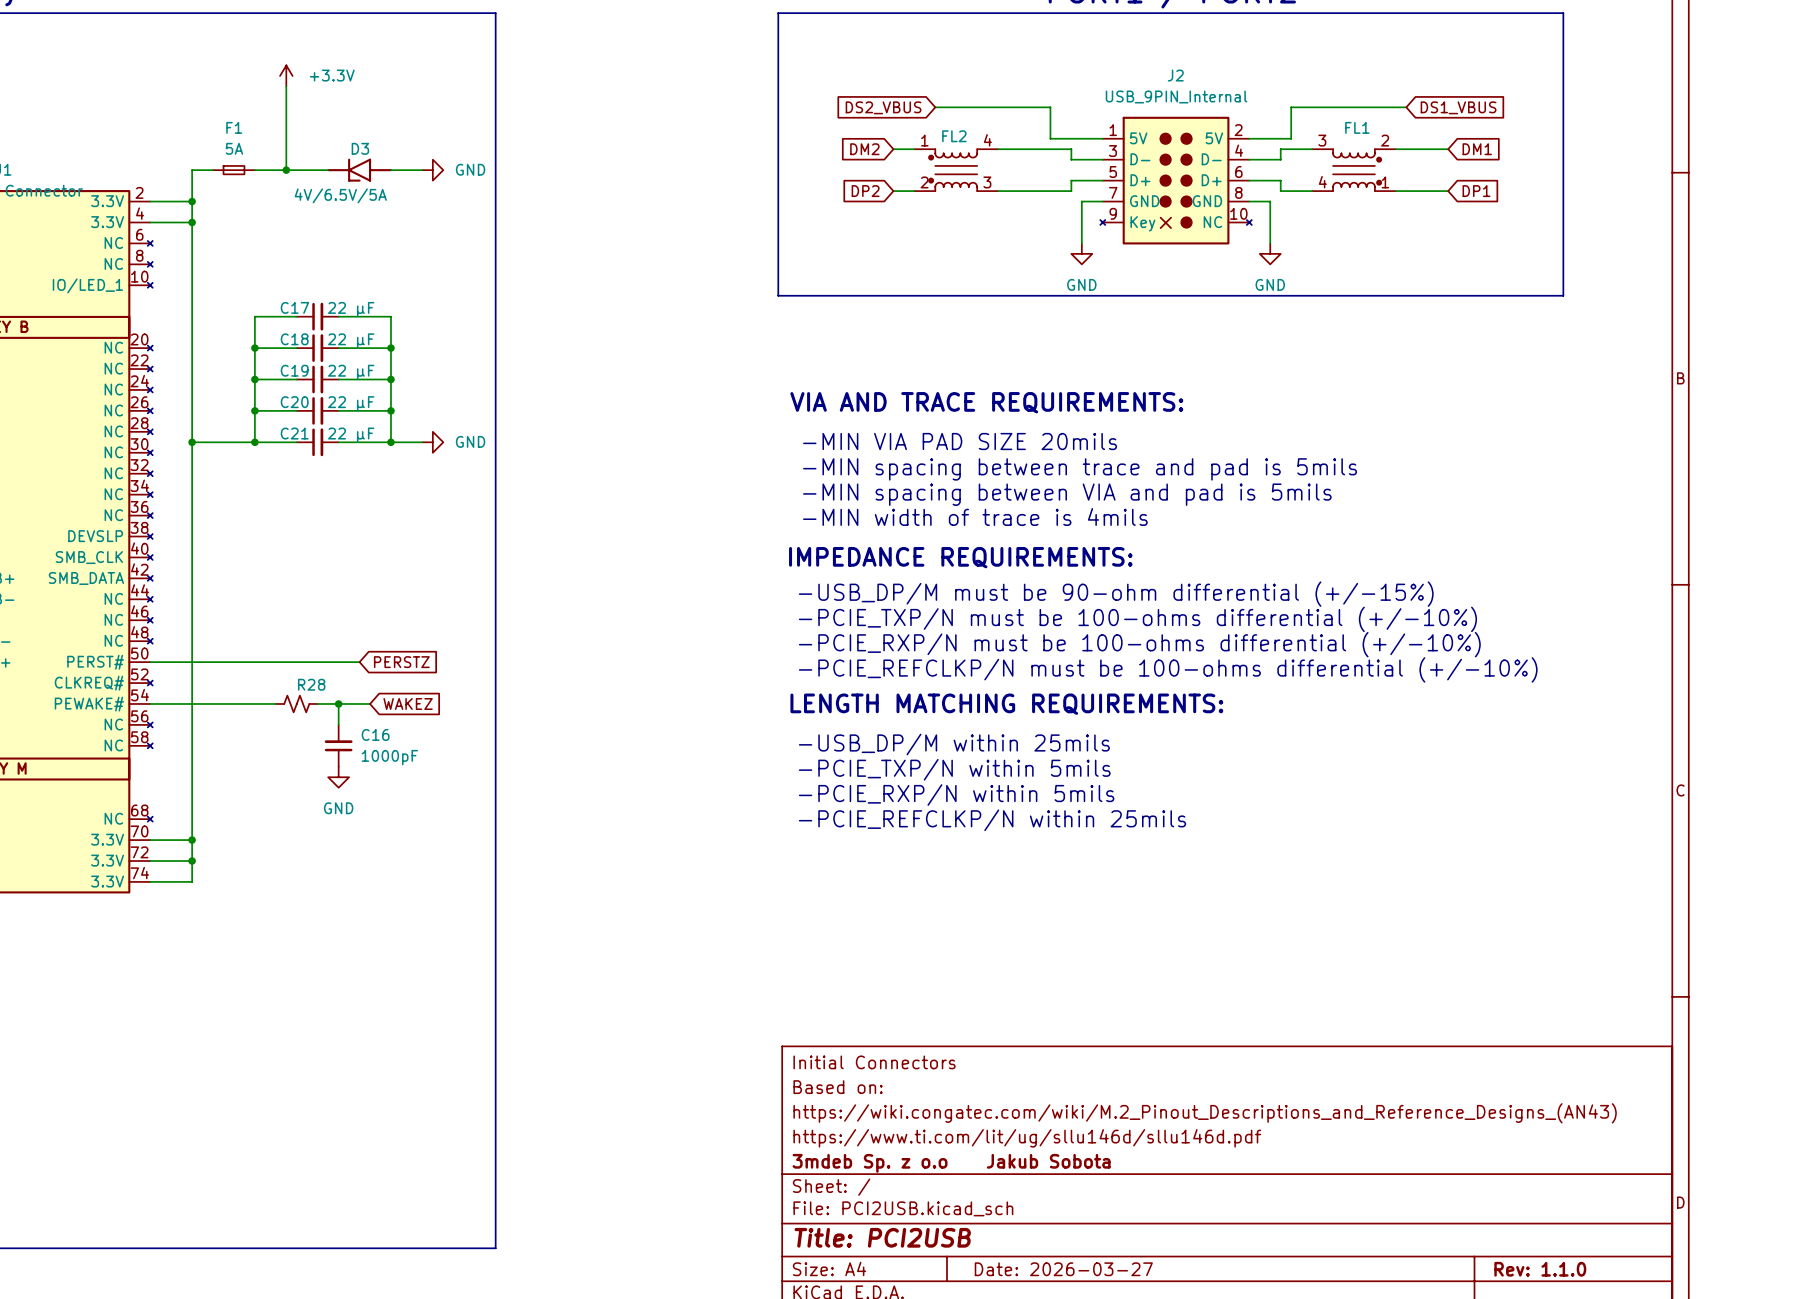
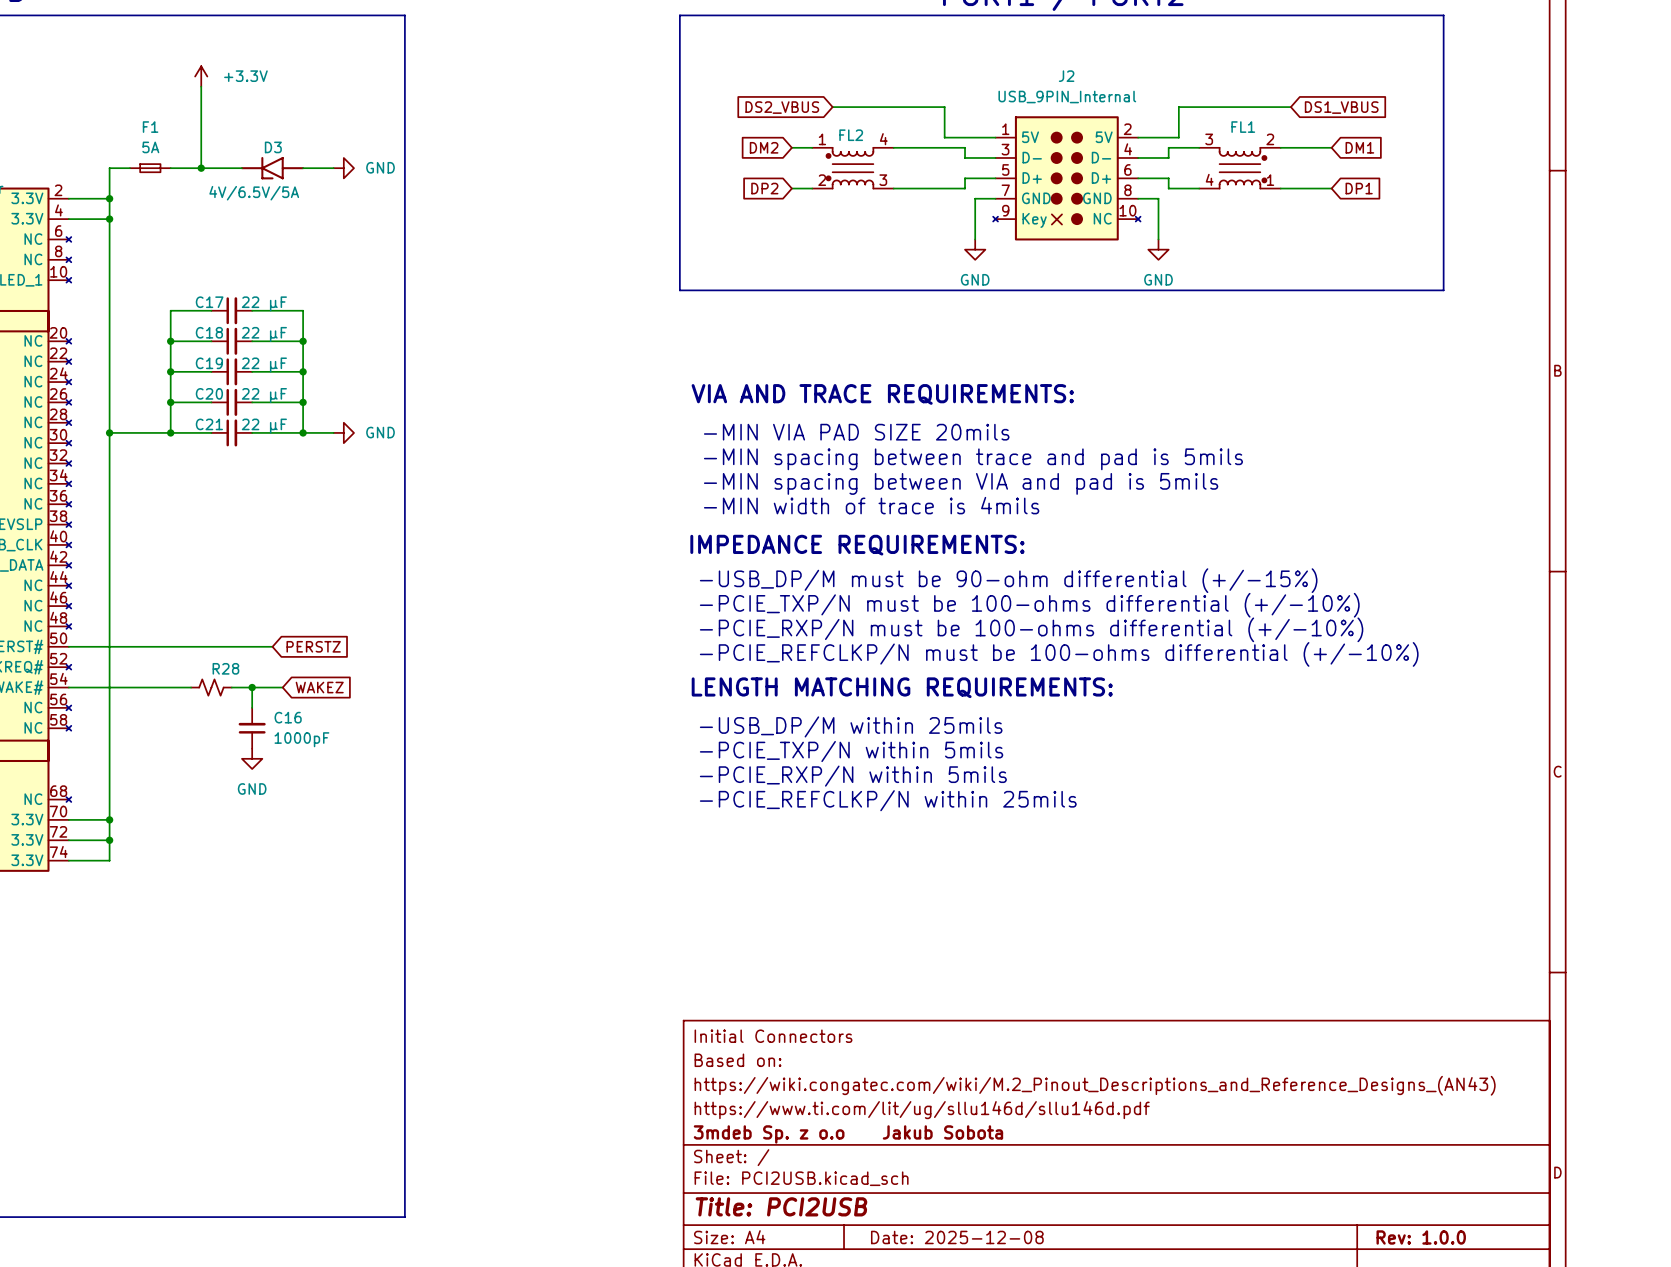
title block: Date: 2026-03-27 (1063, 1269) -> Date: 2025-12-08 (957, 1237)
title block: Rev: 1.1.0 (1540, 1269) -> Rev: 1.0.0 (1421, 1237)

